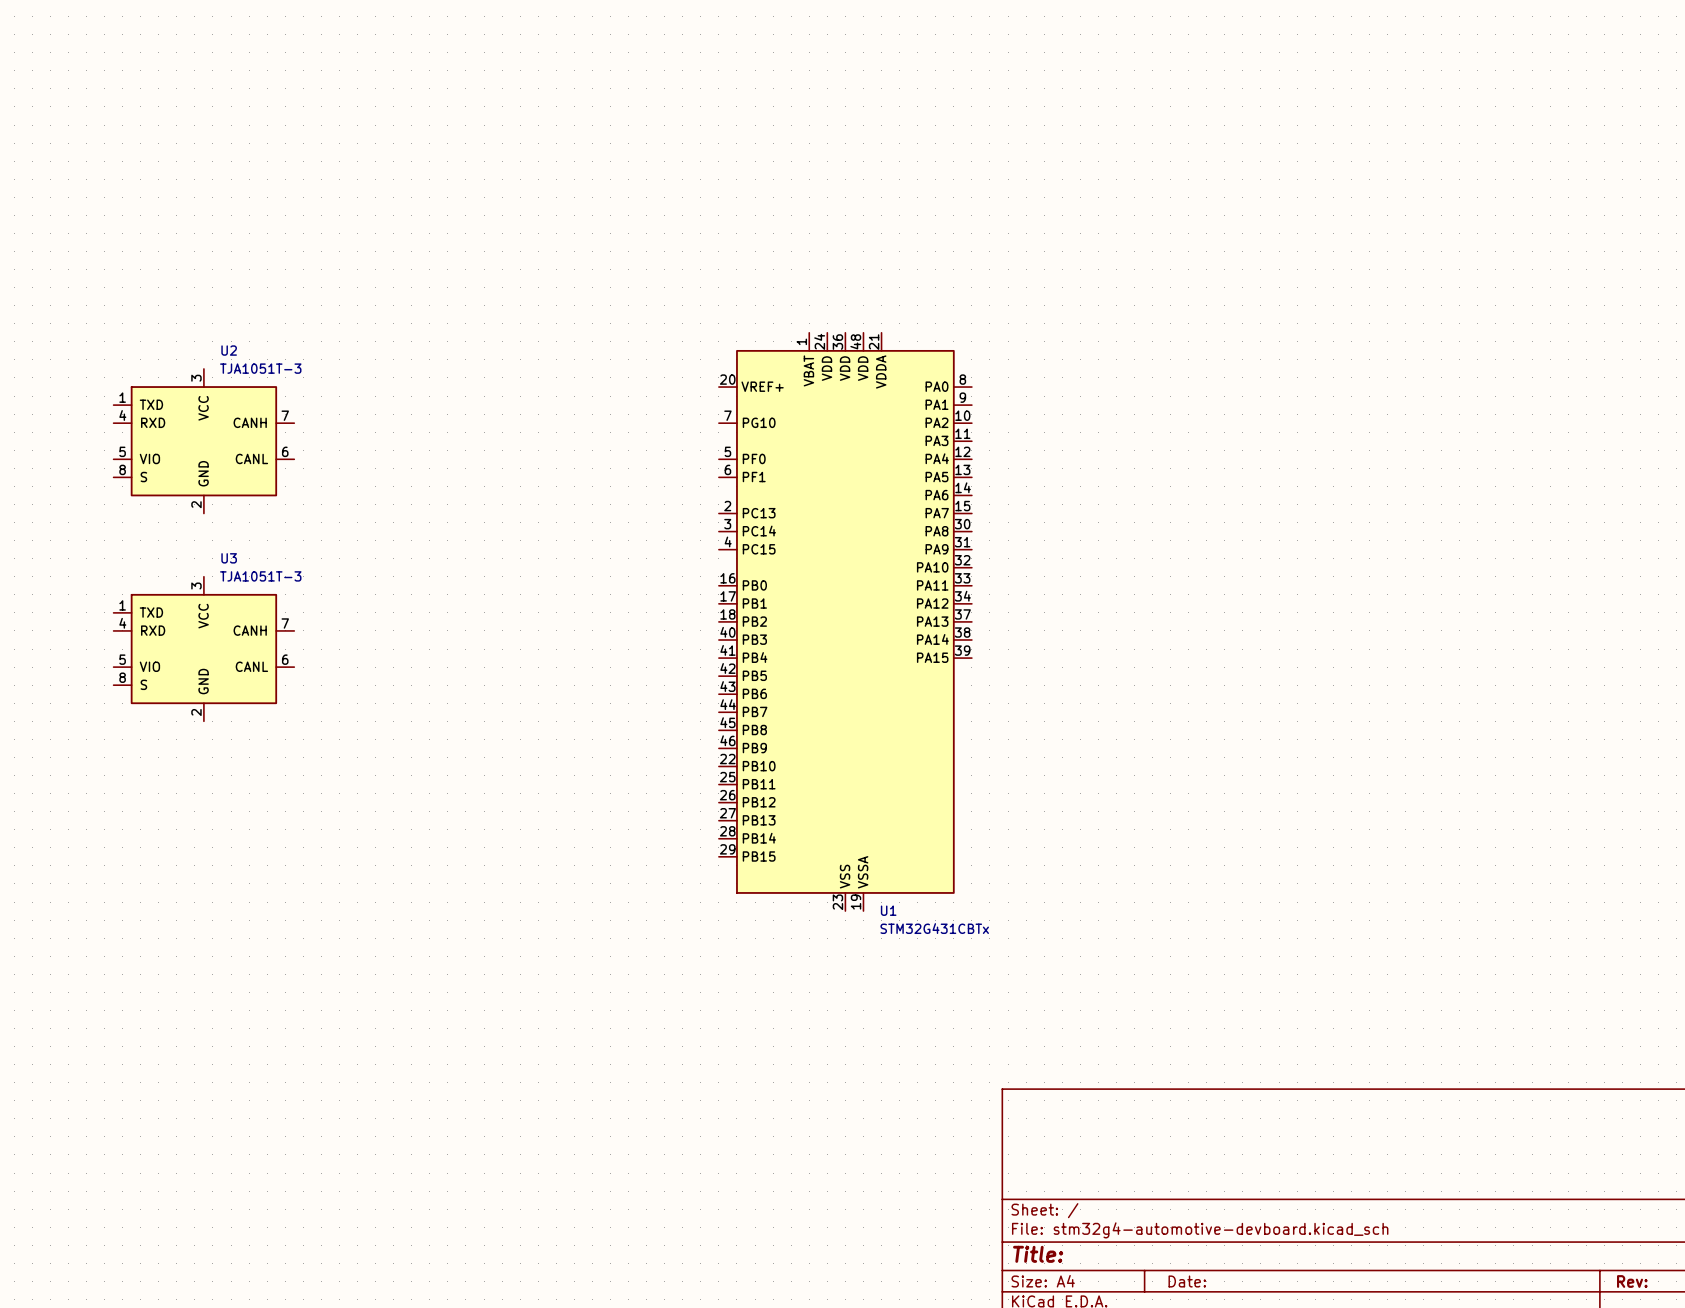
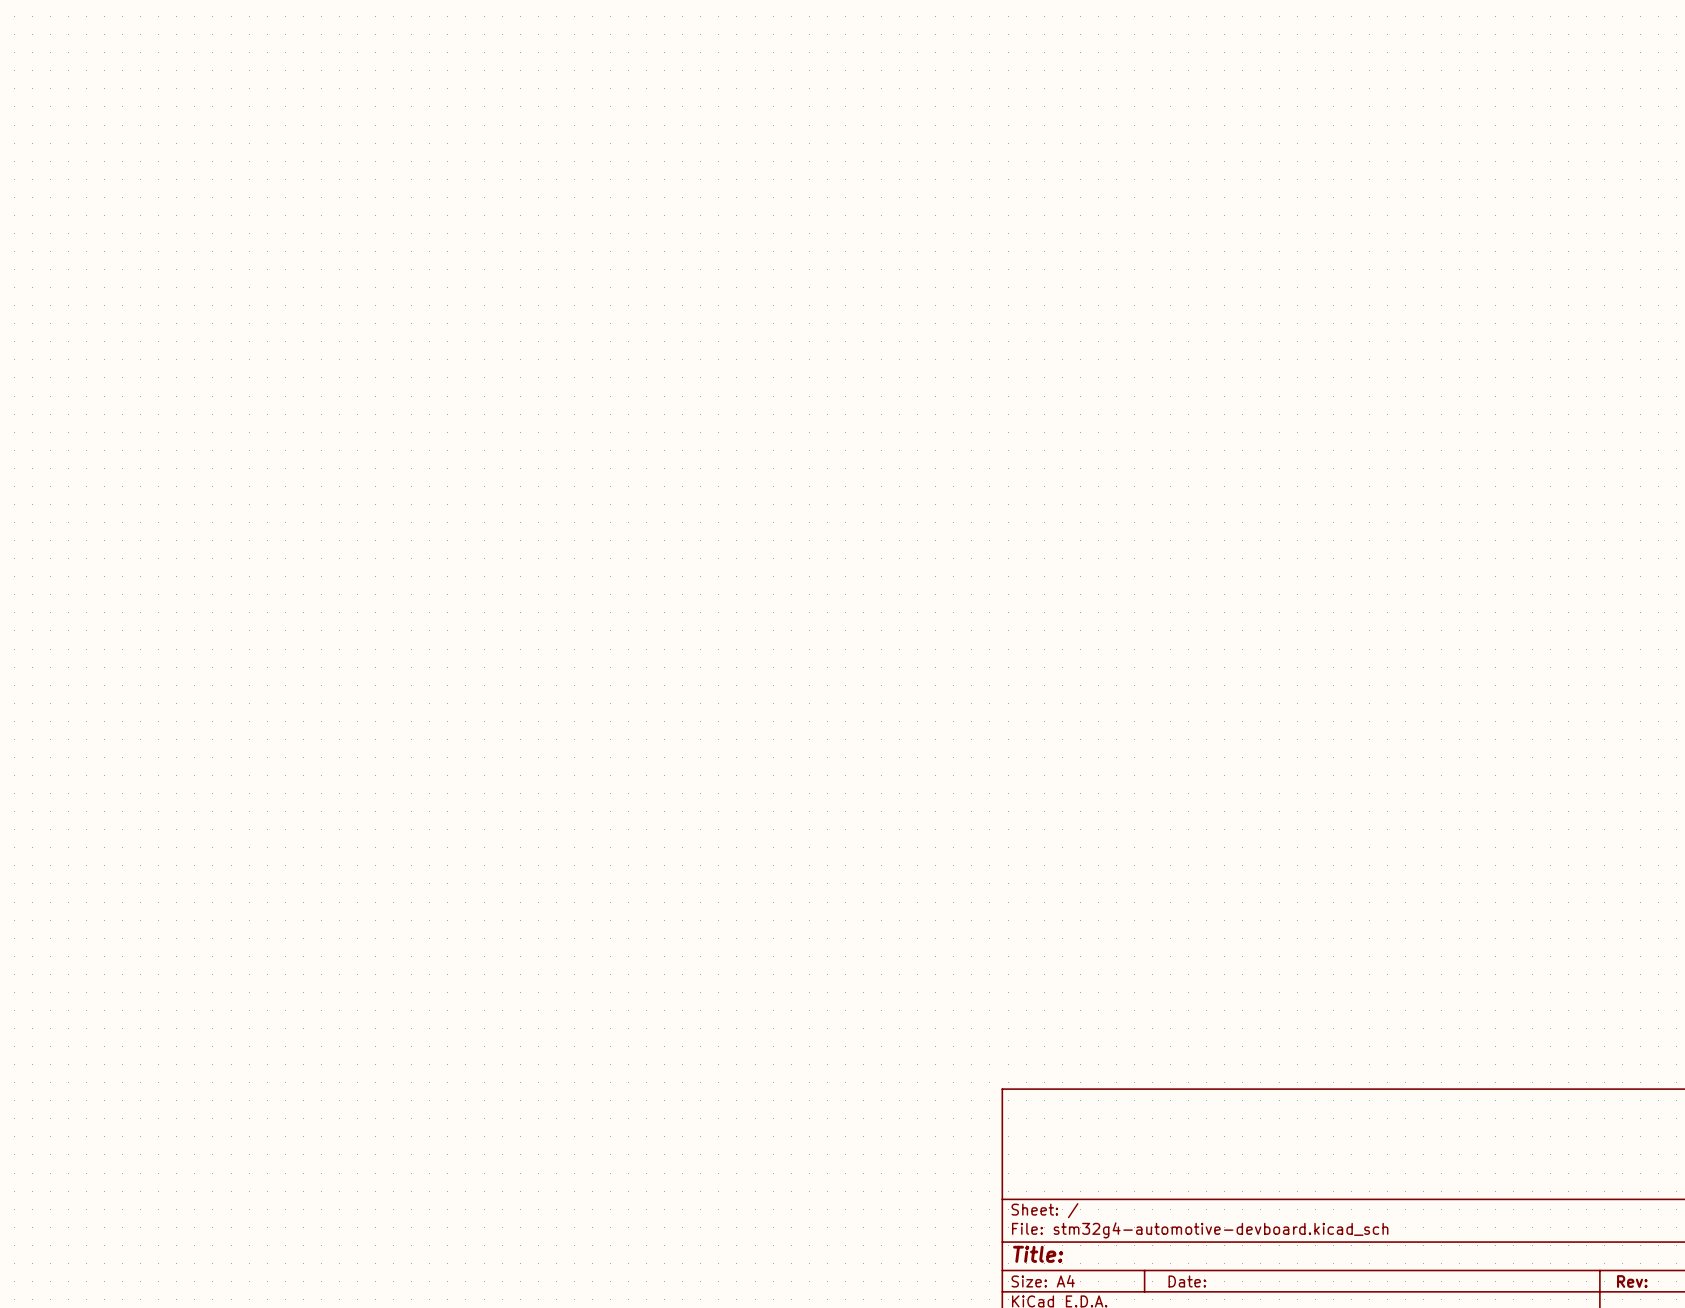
U2: TJA1051T-3 (203, 441) -> none
U1: STM32G431CBTx (845, 621) -> none
U3: TJA1051T-3 (203, 649) -> none

